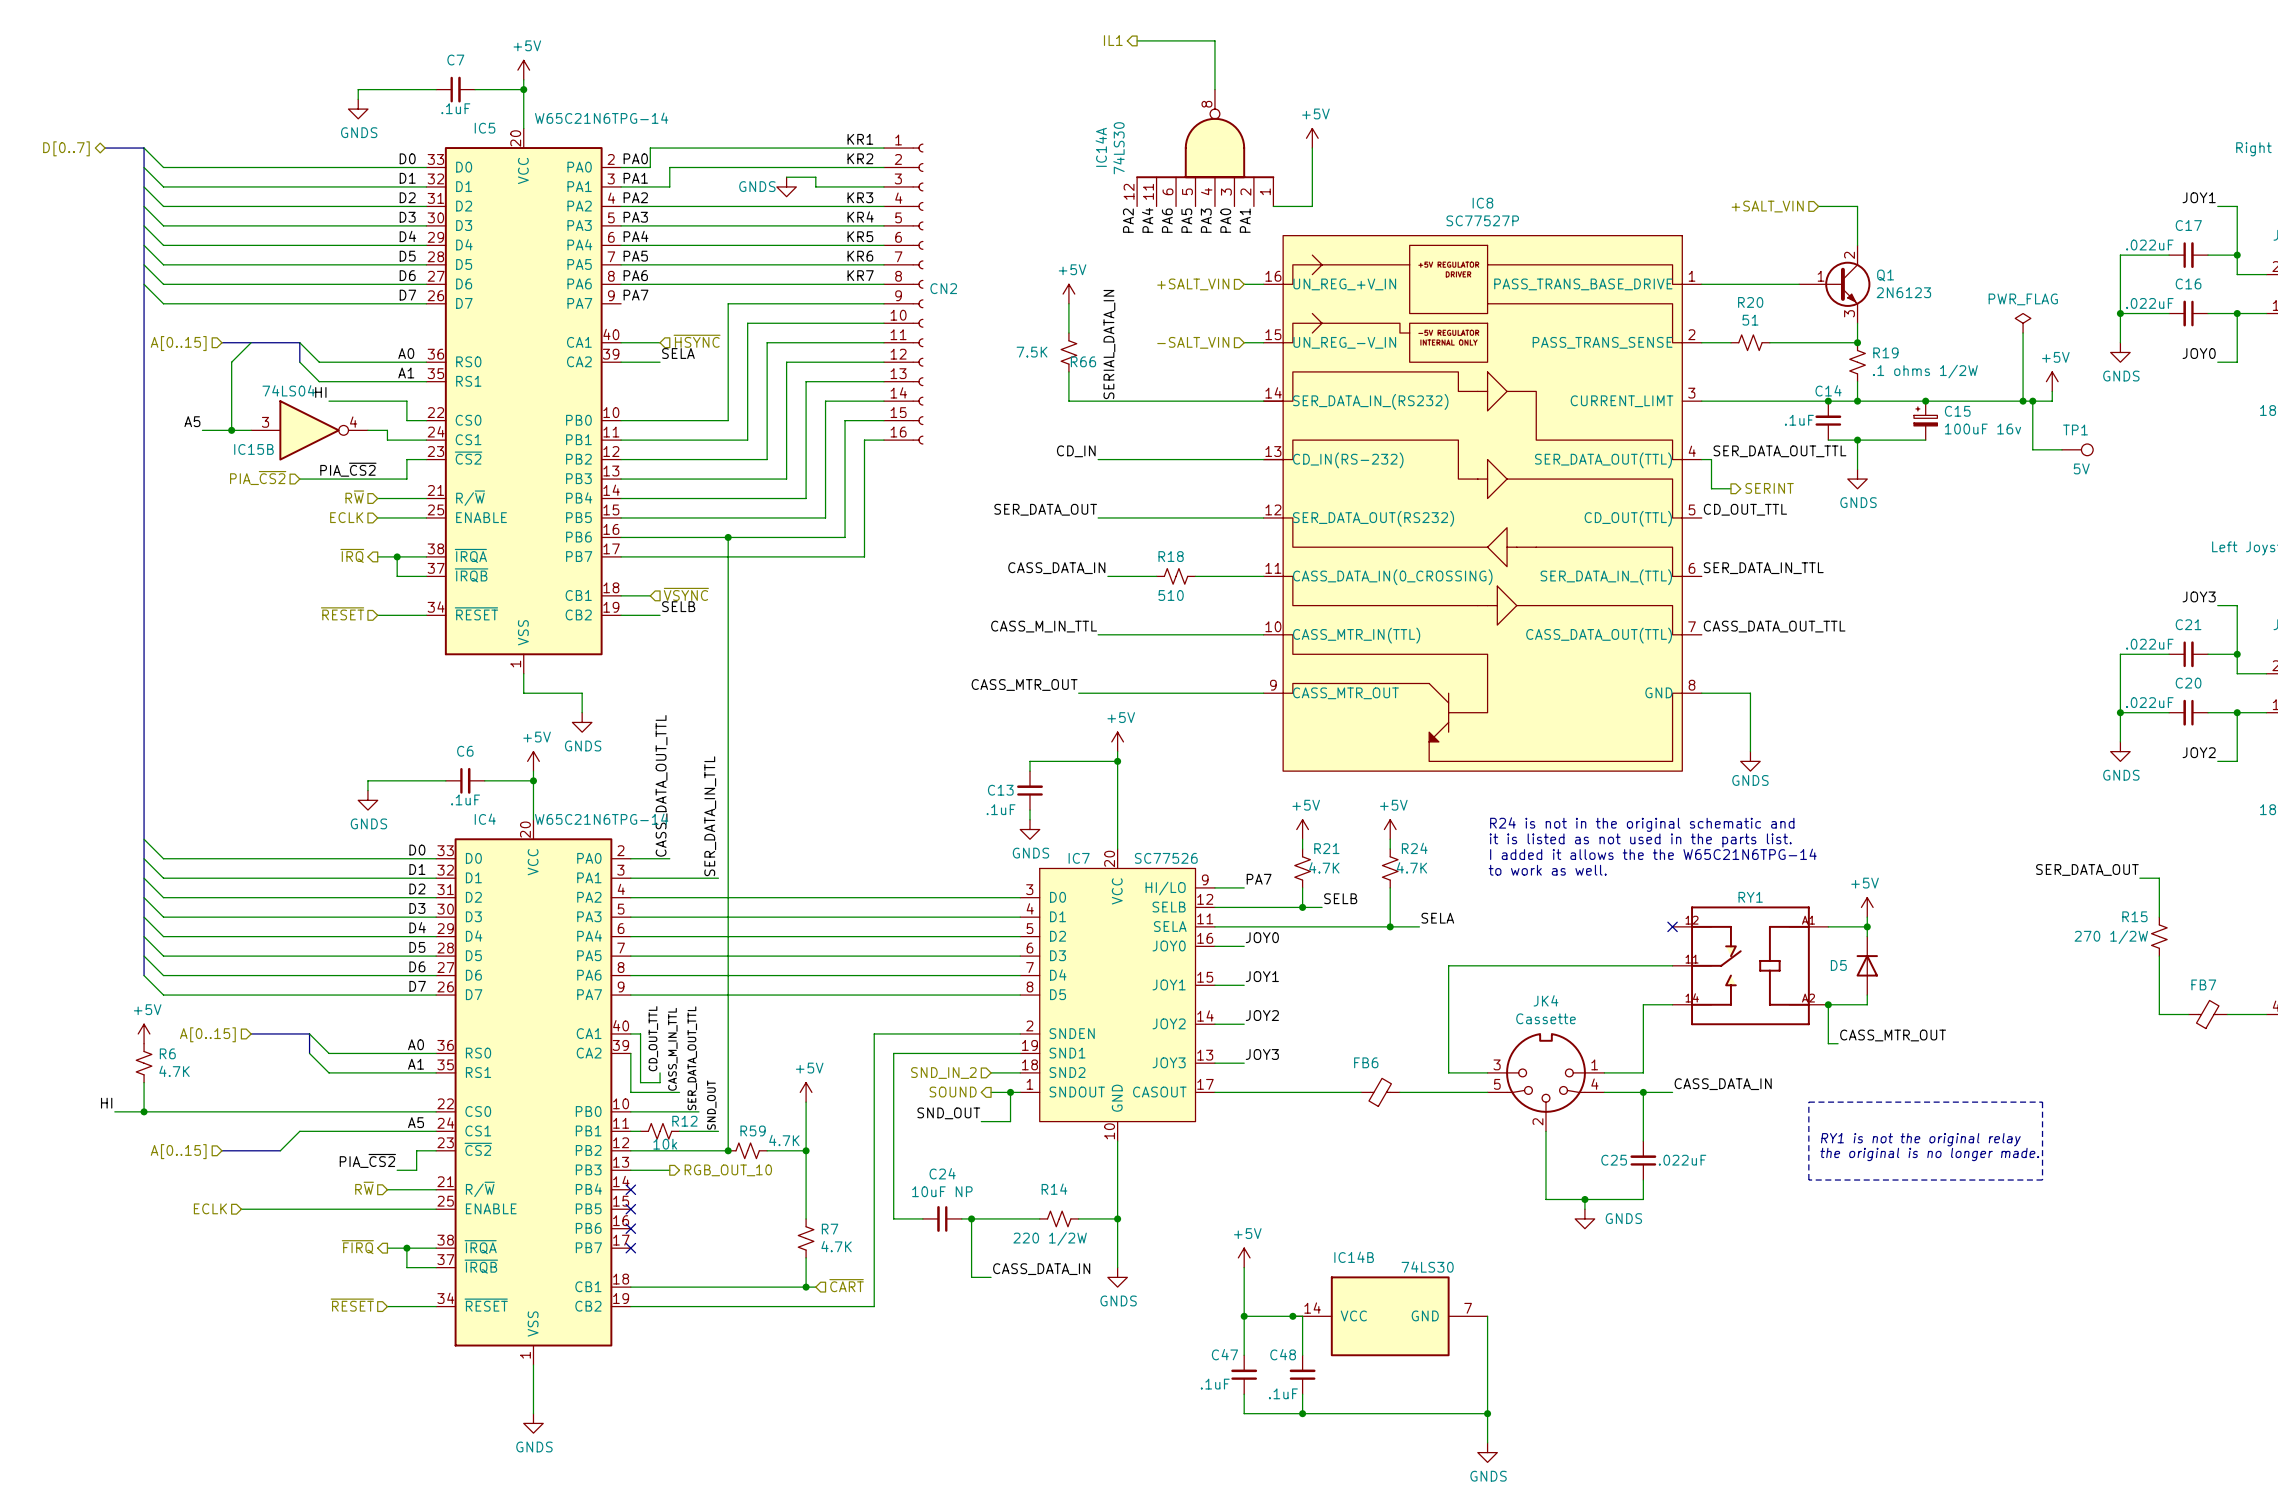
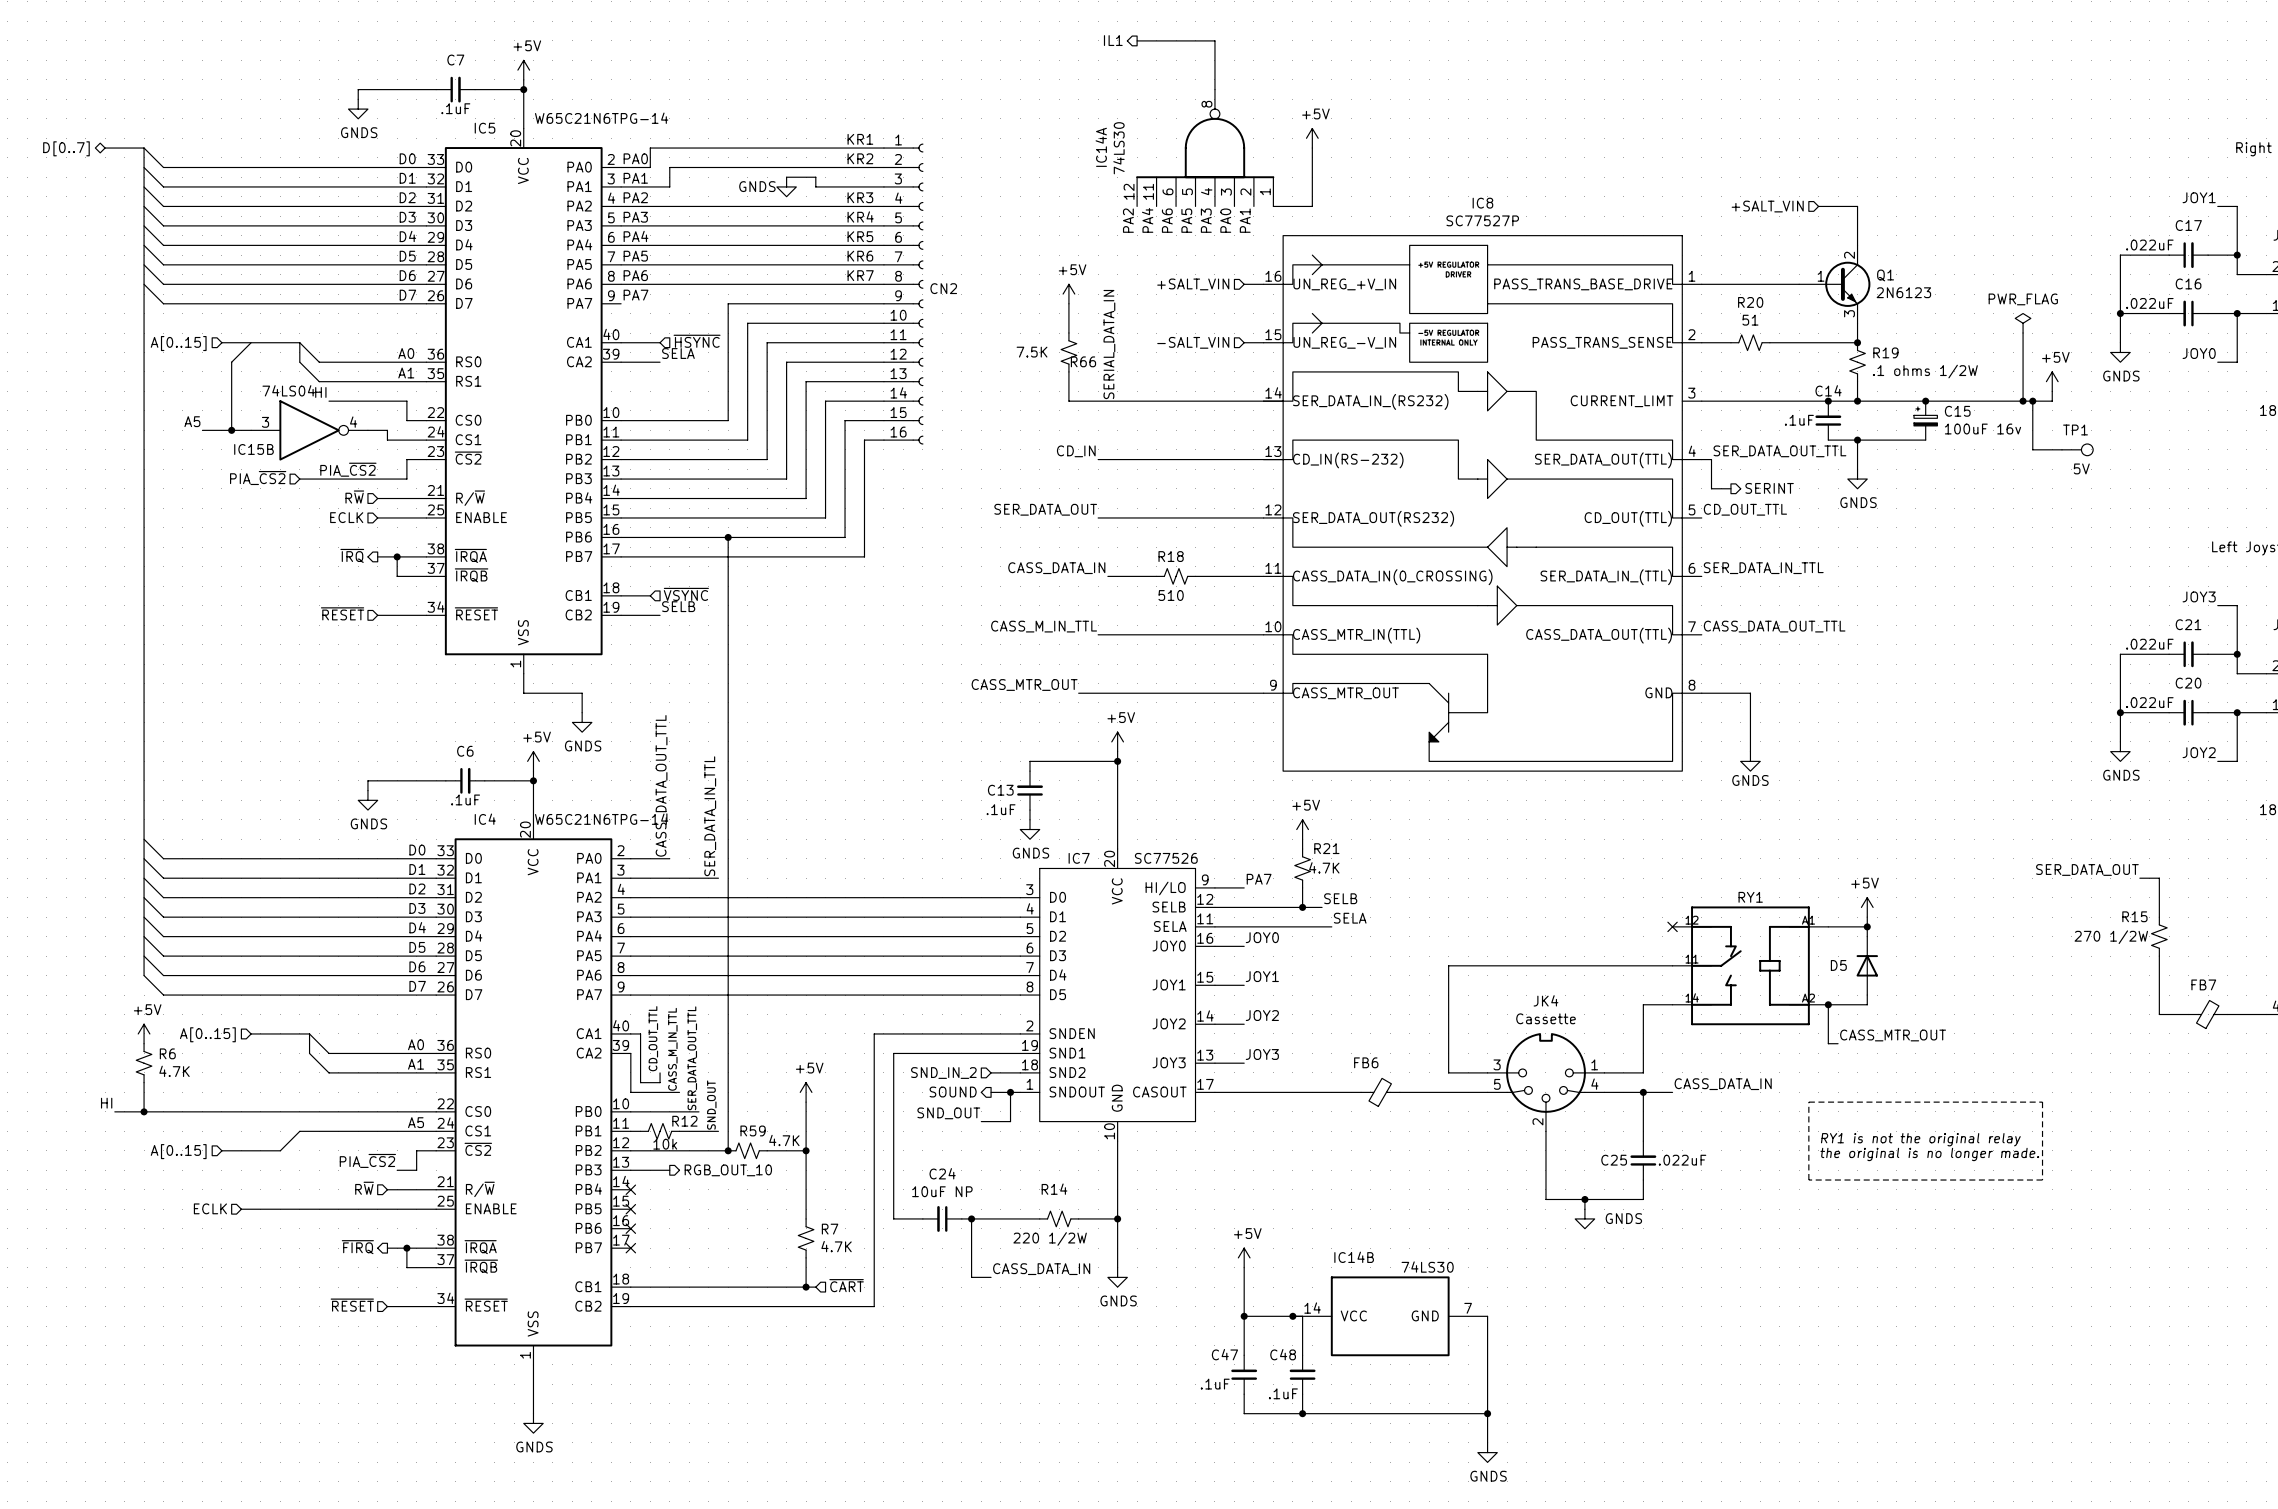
text: R24 is not in the original schematic and (1642, 824) -> none
power symbol: +5V (1390, 829) -> none
wire: (1390, 839) (1390, 849) -> none
text: it is listed as not used in the parts list. (1640, 840) -> none
text: I added it allows the the W65C21N6TPG-14 (1653, 854) -> none
R24: 4.7K (1390, 868) -> none
text: to work as well. (1547, 870) -> none
wire: (1390, 887) (1390, 926) -> none
label position: SELA (1437, 918) -> SELA (1350, 918)
wire: (1331, 926) (1419, 926) -> none
junction: (1390, 926) -> none

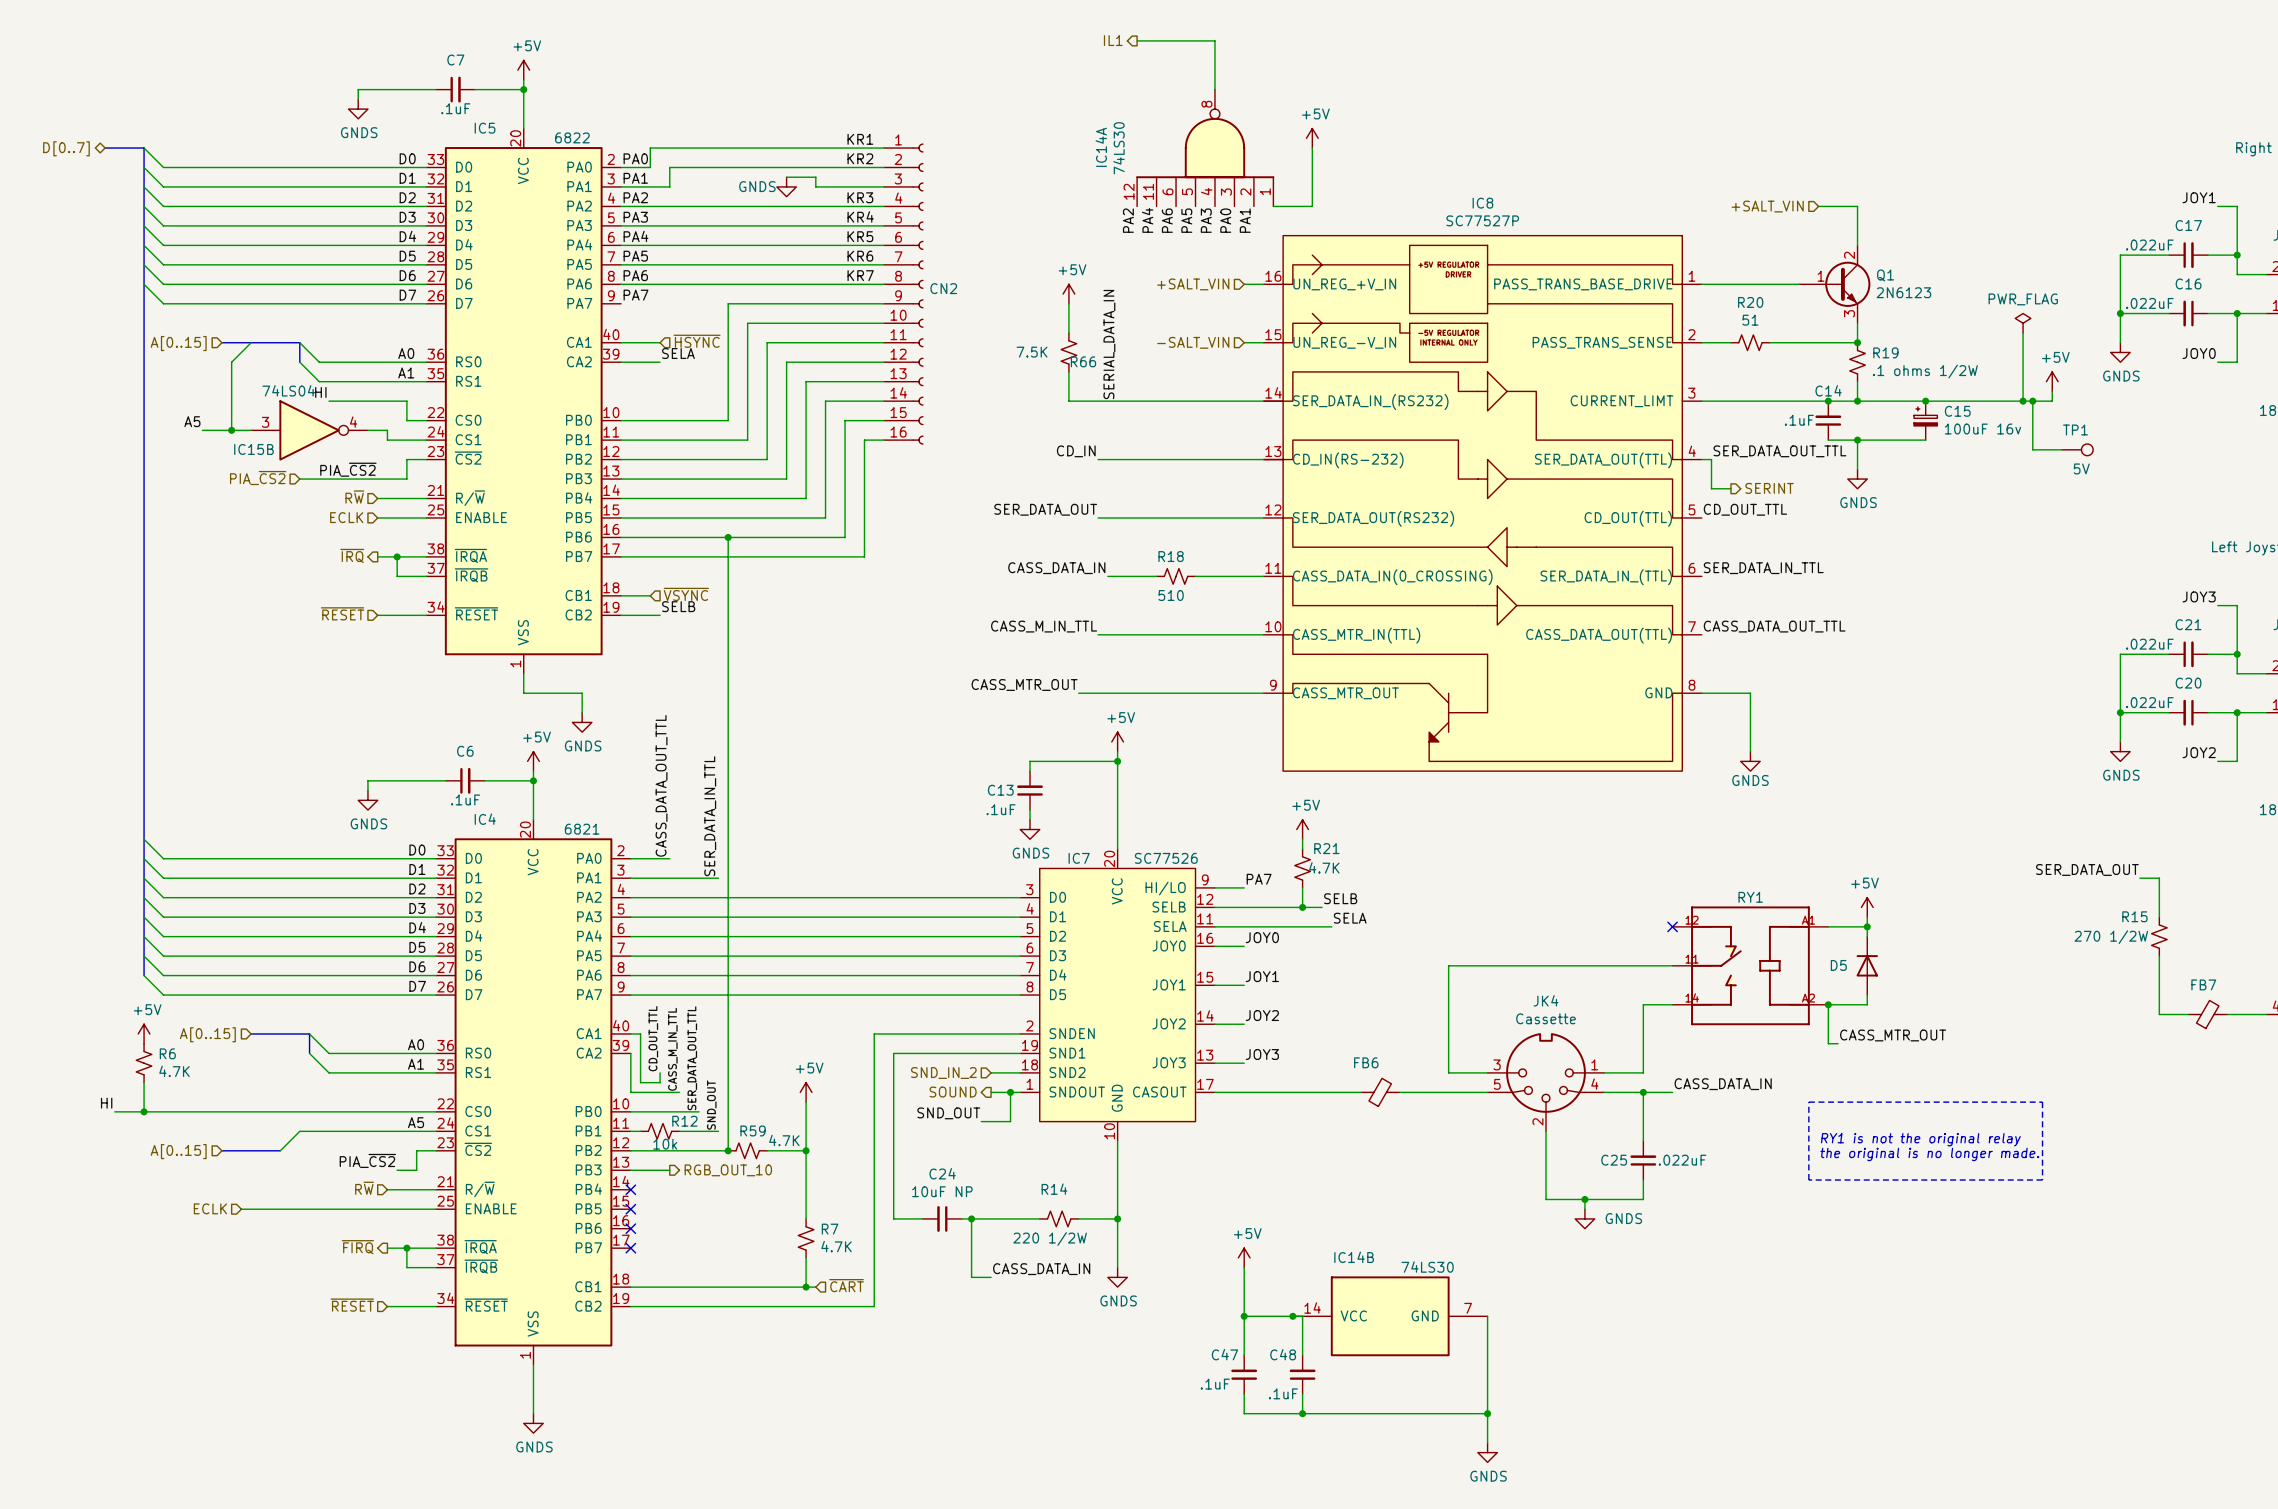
IC5 value: W65C21N6TPG-14 (601, 118) -> 6822 (572, 137)
IC4 value: W65C21N6TPG-14 (601, 819) -> 6821 (582, 829)

